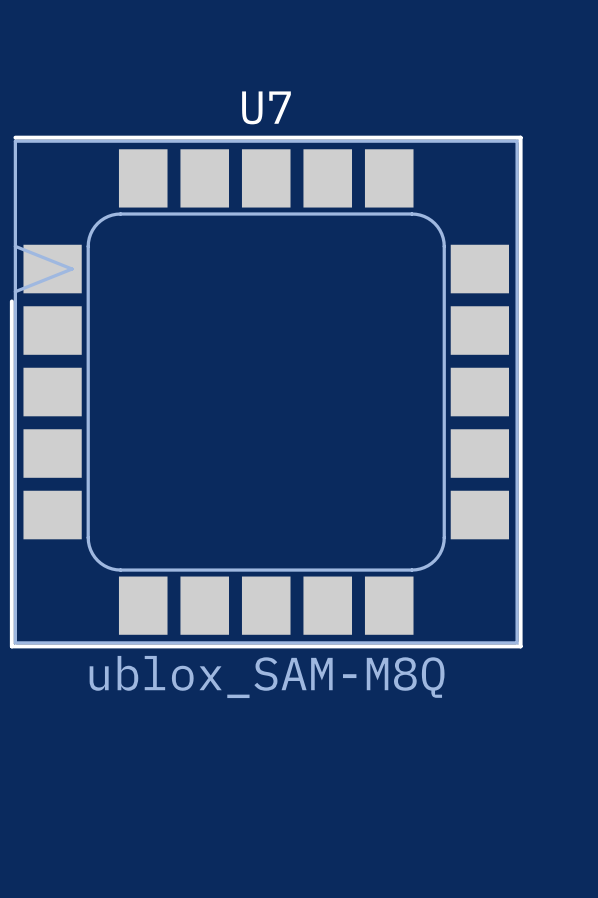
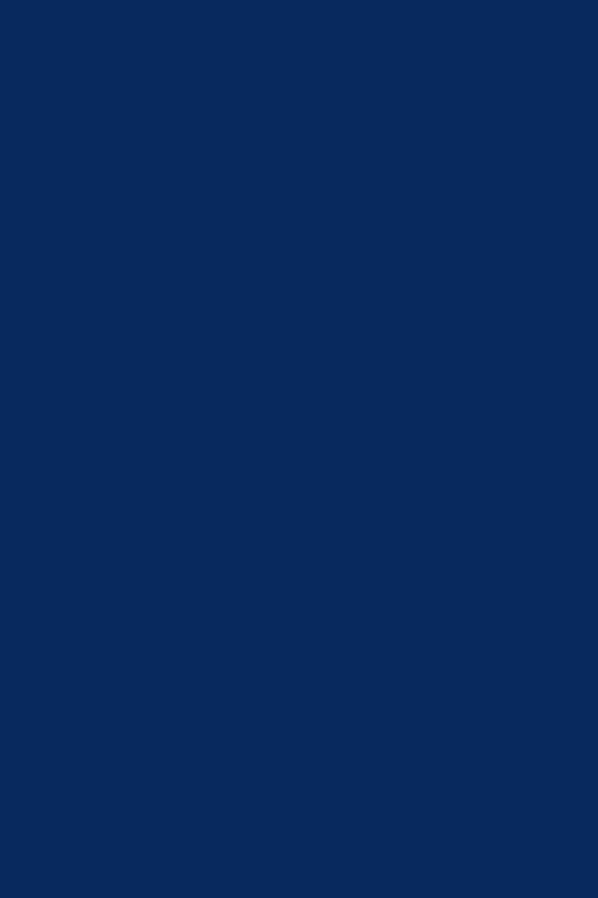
U7: ublox_SAM-M8Q (266, 392) -> none

